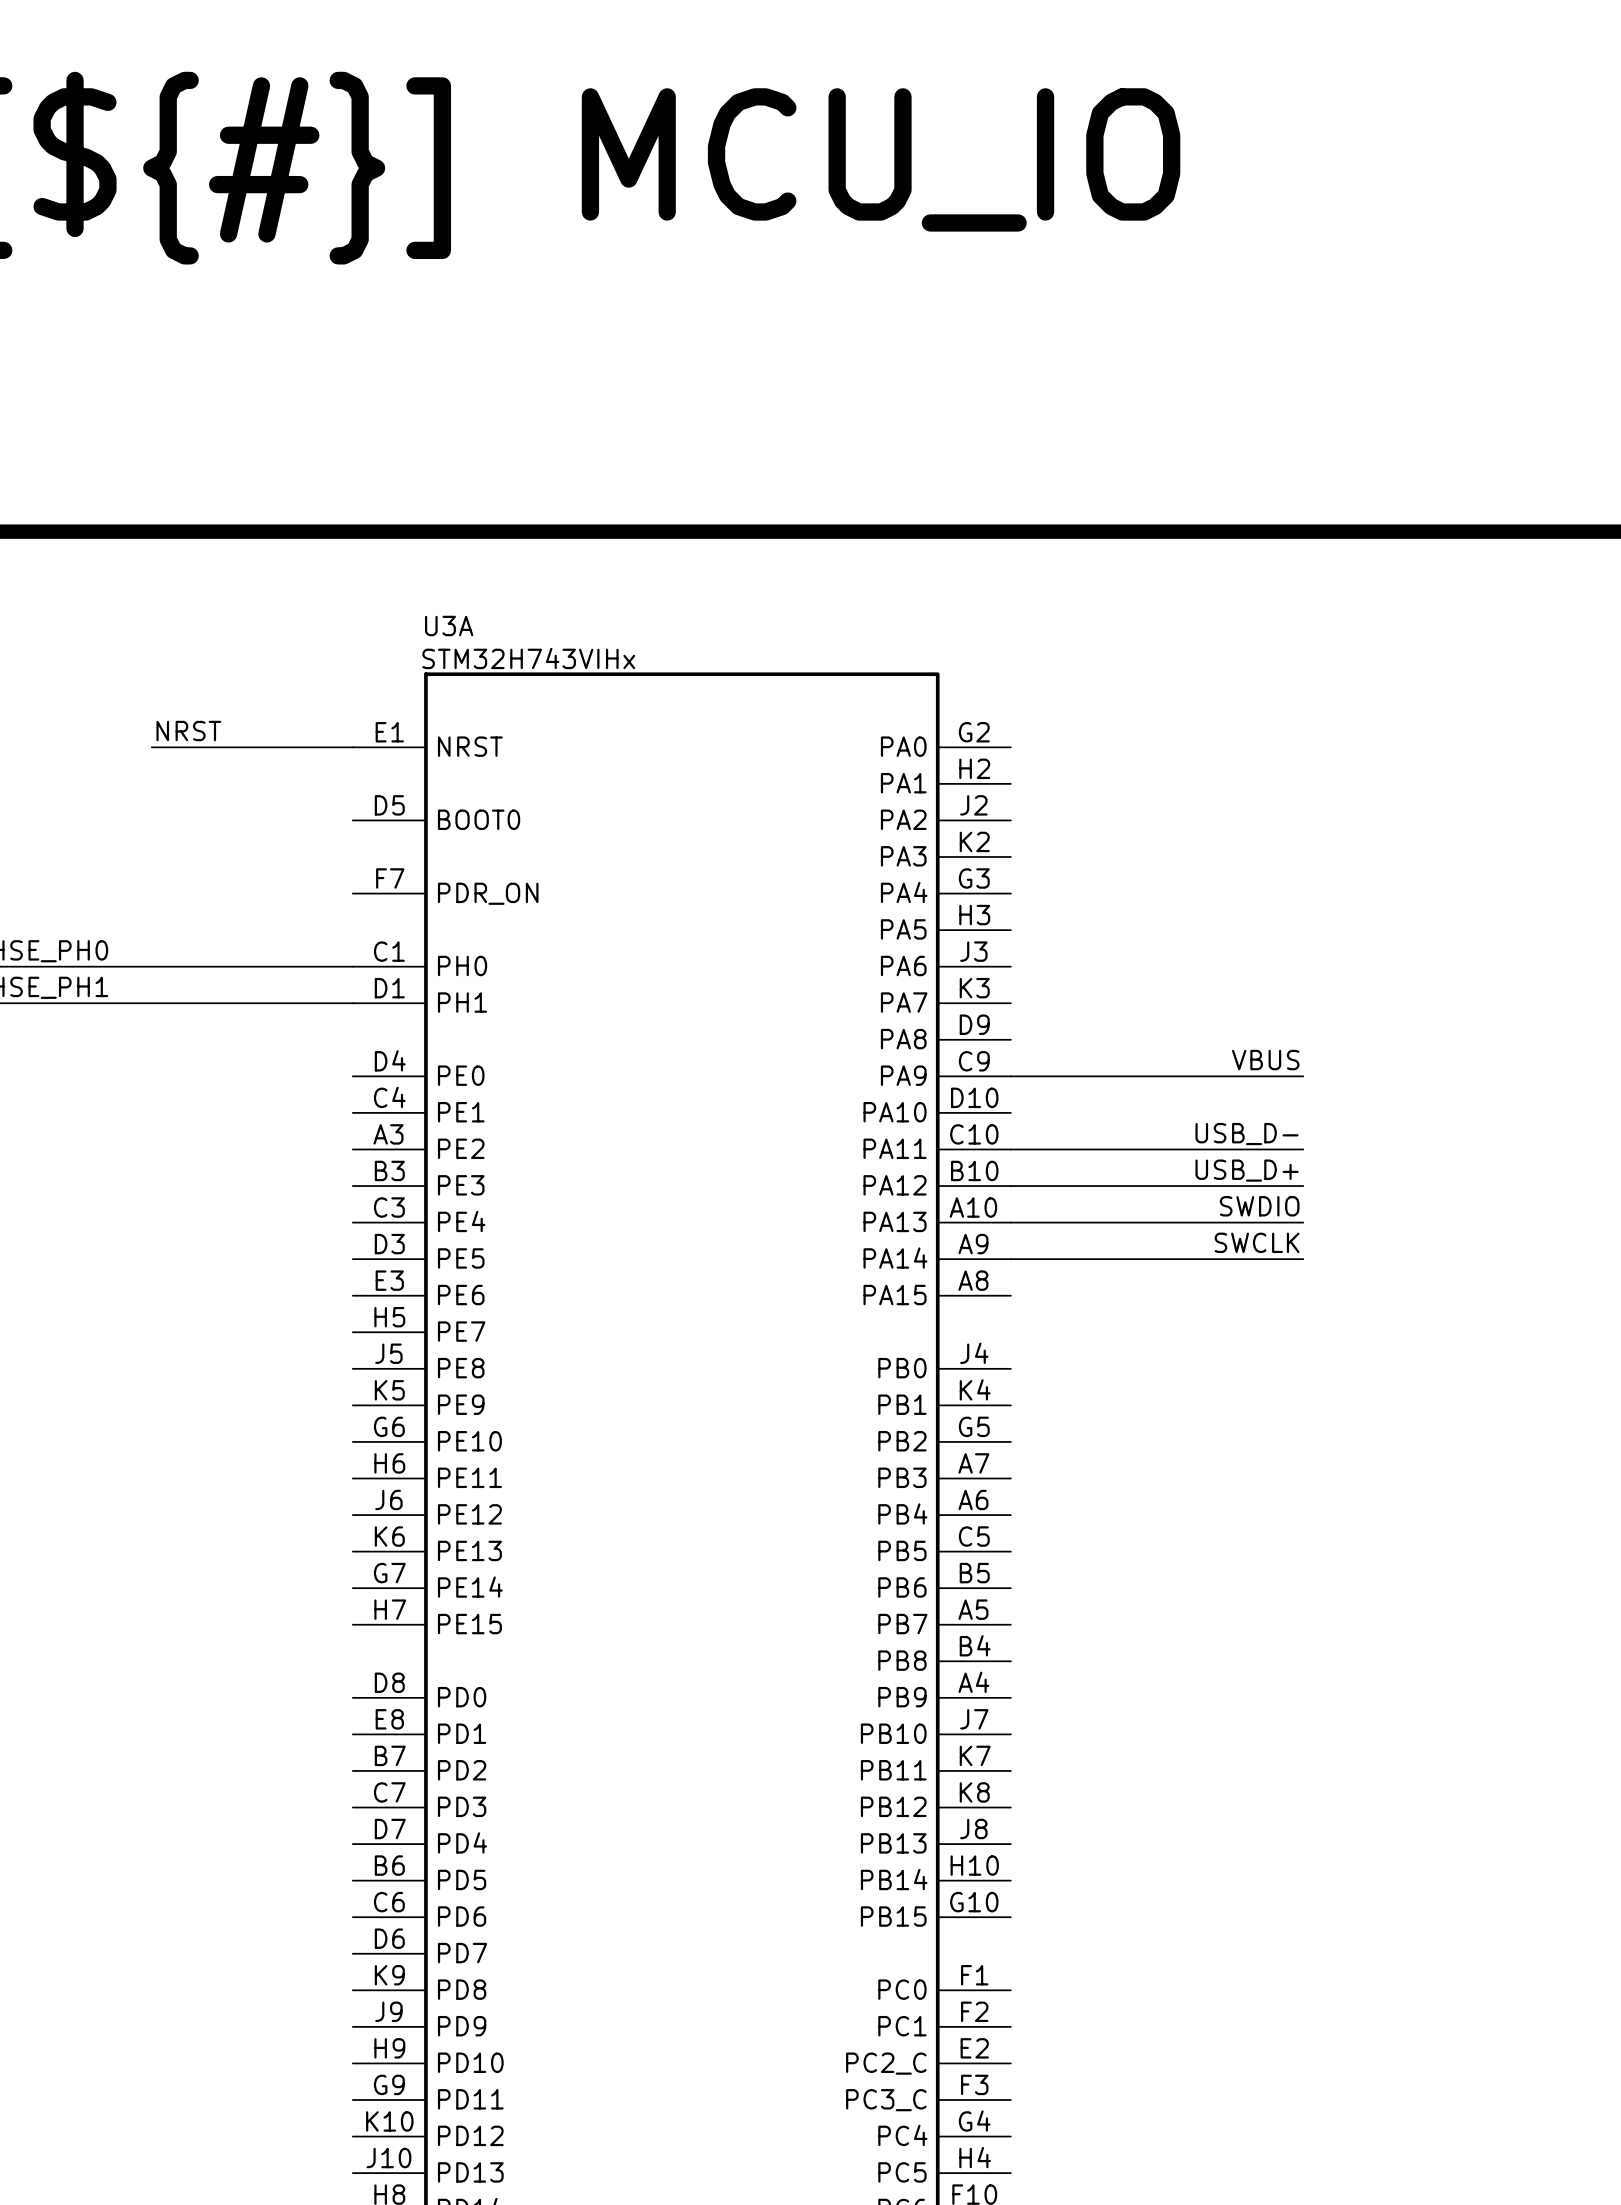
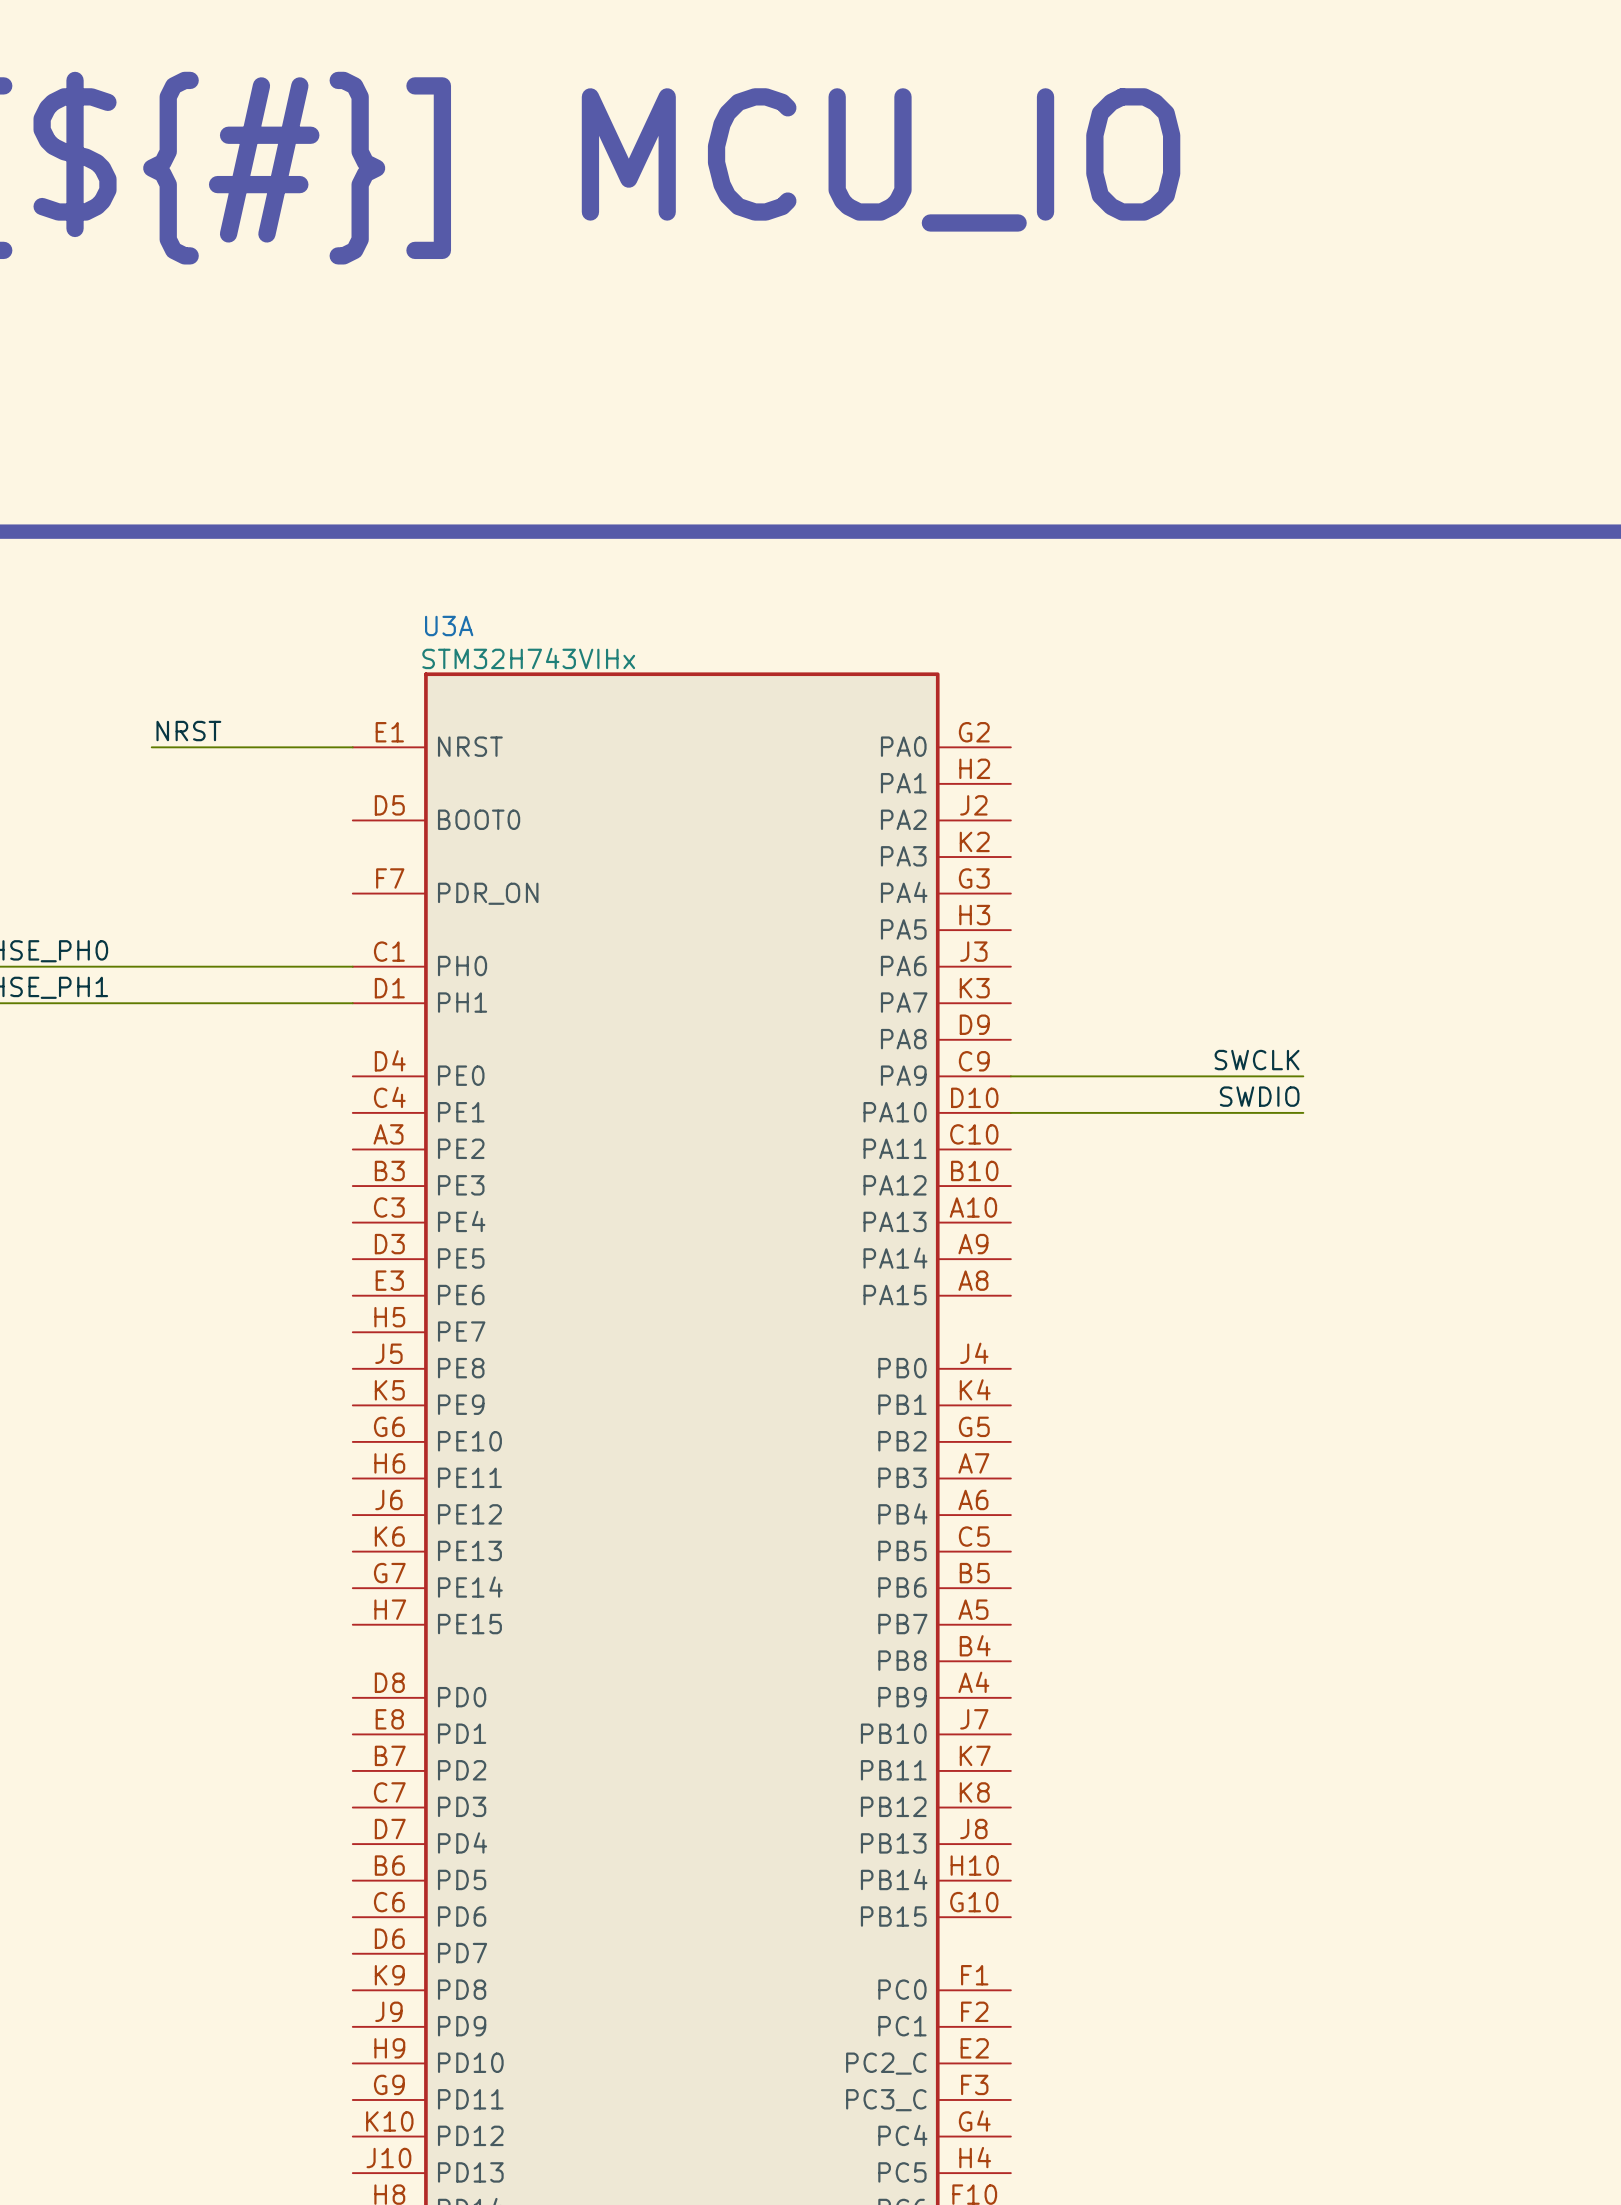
label: VBUS (1265, 1060) -> SWCLK (1257, 1060)
label: USB_D- (1247, 1134) -> none
wire: (1010, 1149) (1303, 1149) -> (1010, 1112) (1303, 1112)
label: USB_D+ (1247, 1170) -> none
wire: (1010, 1186) (1303, 1186) -> none
label position: SWDIO (1259, 1206) -> SWDIO (1259, 1096)
wire: (1010, 1222) (1303, 1222) -> none
label: SWCLK (1257, 1242) -> none
wire: (1010, 1259) (1303, 1259) -> none

